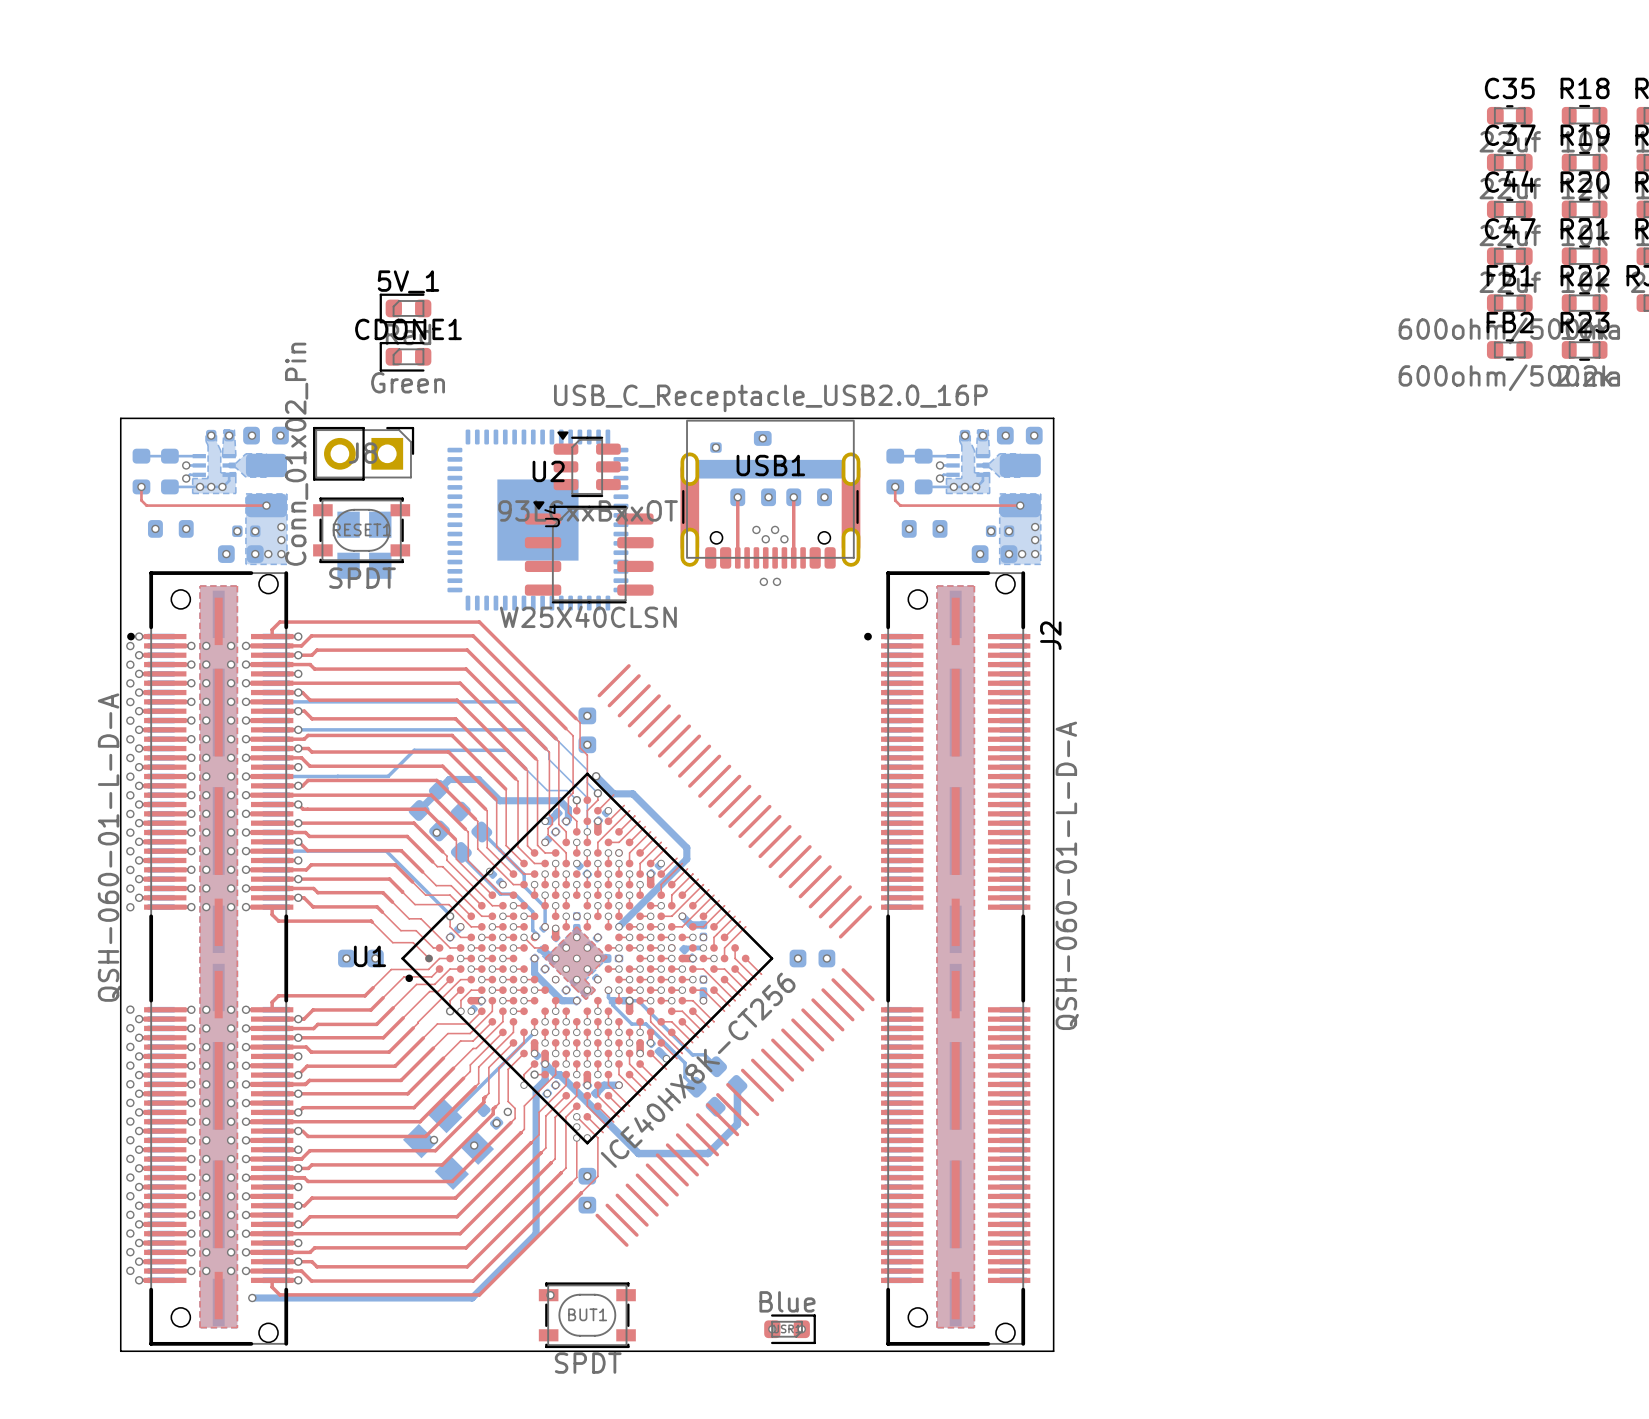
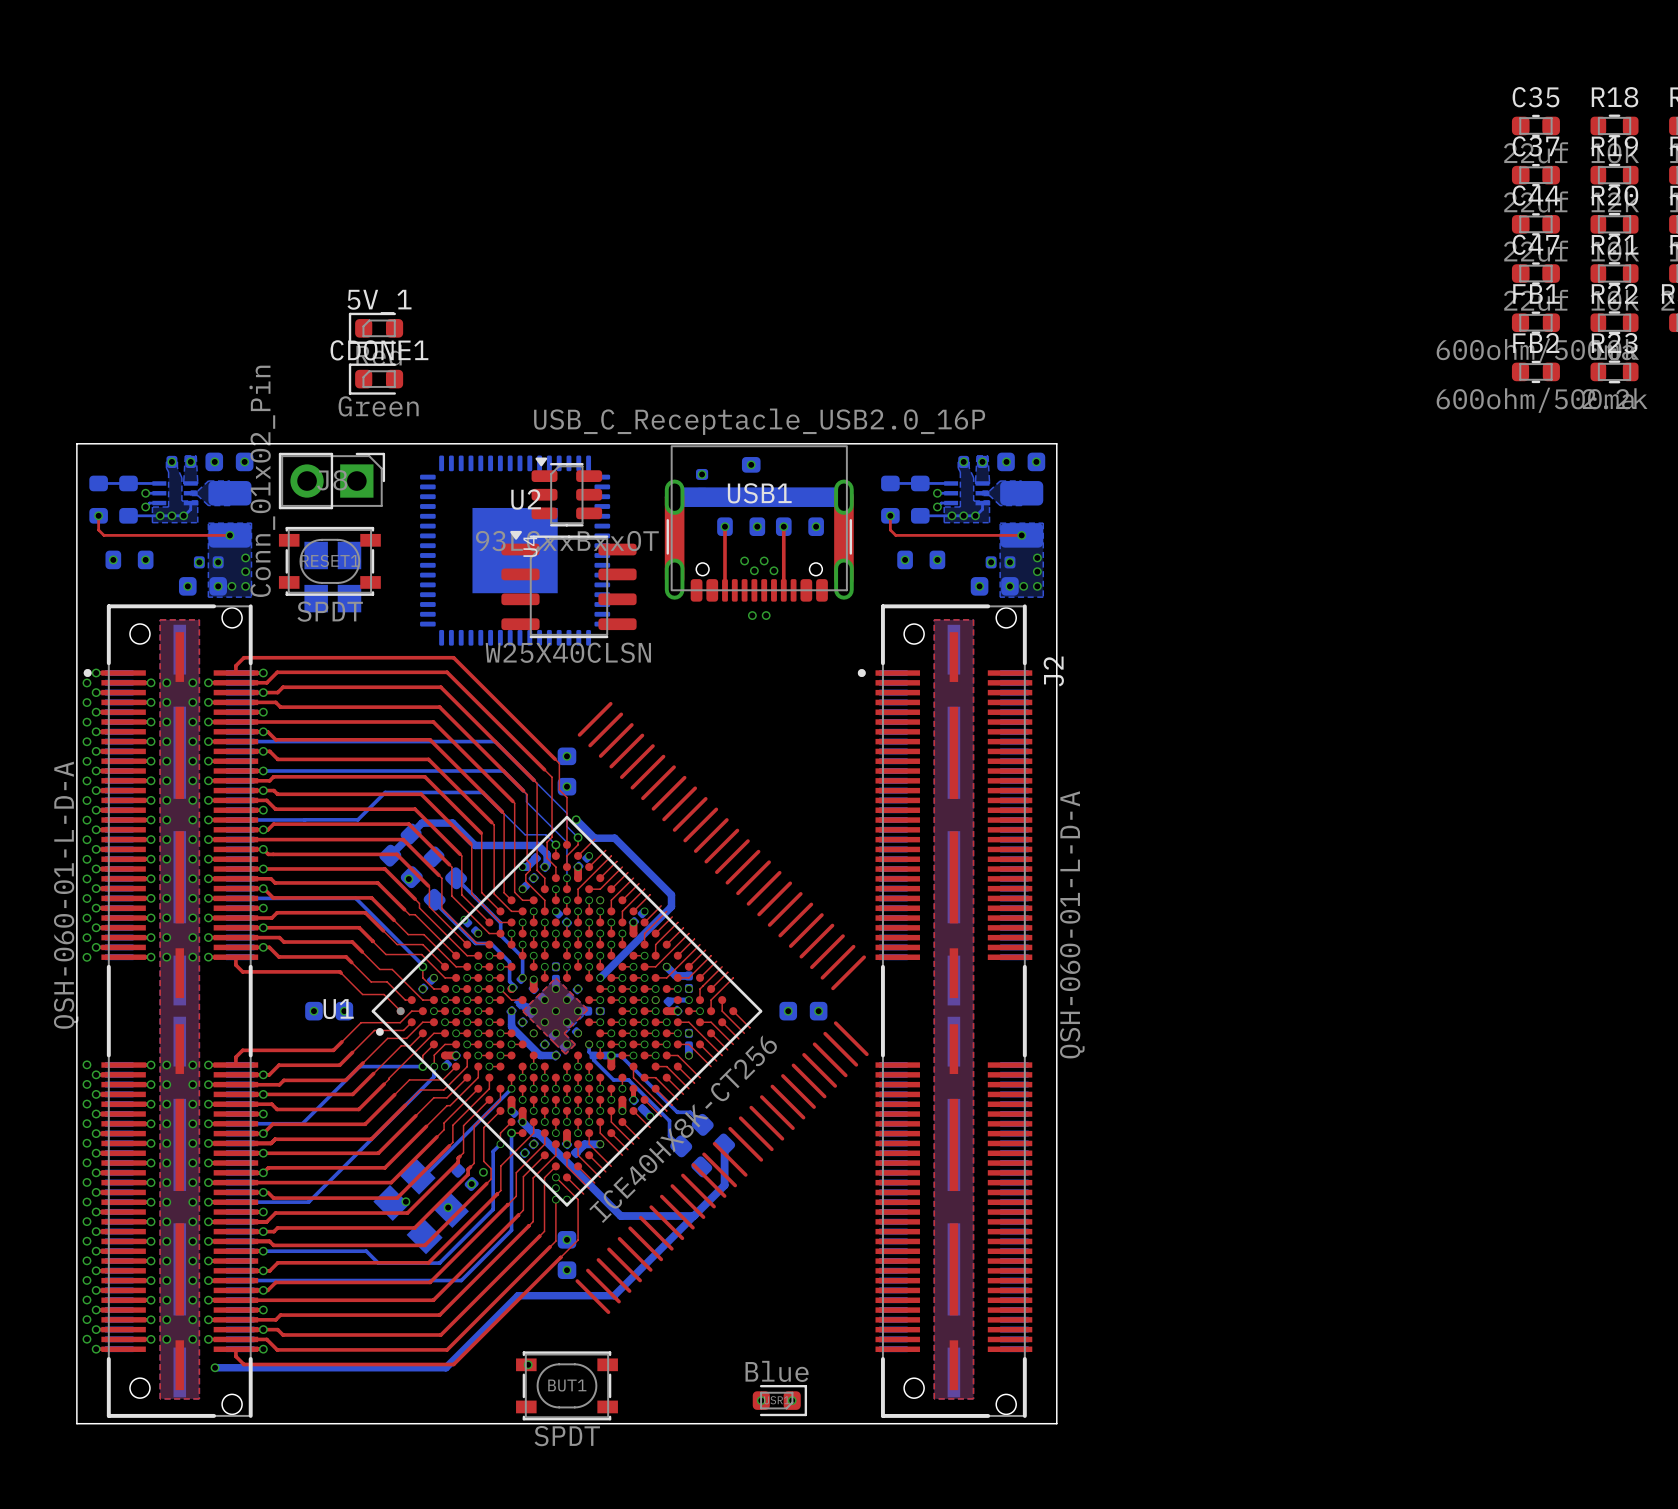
bottom track: none -> (422, 1066) (359, 1066) (302, 1123) (240, 1123)
bottom track: none -> (433, 1066) (433, 1076) (308, 1202) (240, 1202)
bottom track: (545, 1064) (545, 1080) (536, 1089) (536, 1234) -> (696, 1213) (614, 1295) (518, 1295) (513, 1300)
bottom track: none -> (511, 1133) (511, 1230) (461, 1280) (240, 1280)
bottom track: none -> (500, 1144) (493, 1151) (493, 1209) (439, 1263) (378, 1263) (366, 1251) (263, 1251)

